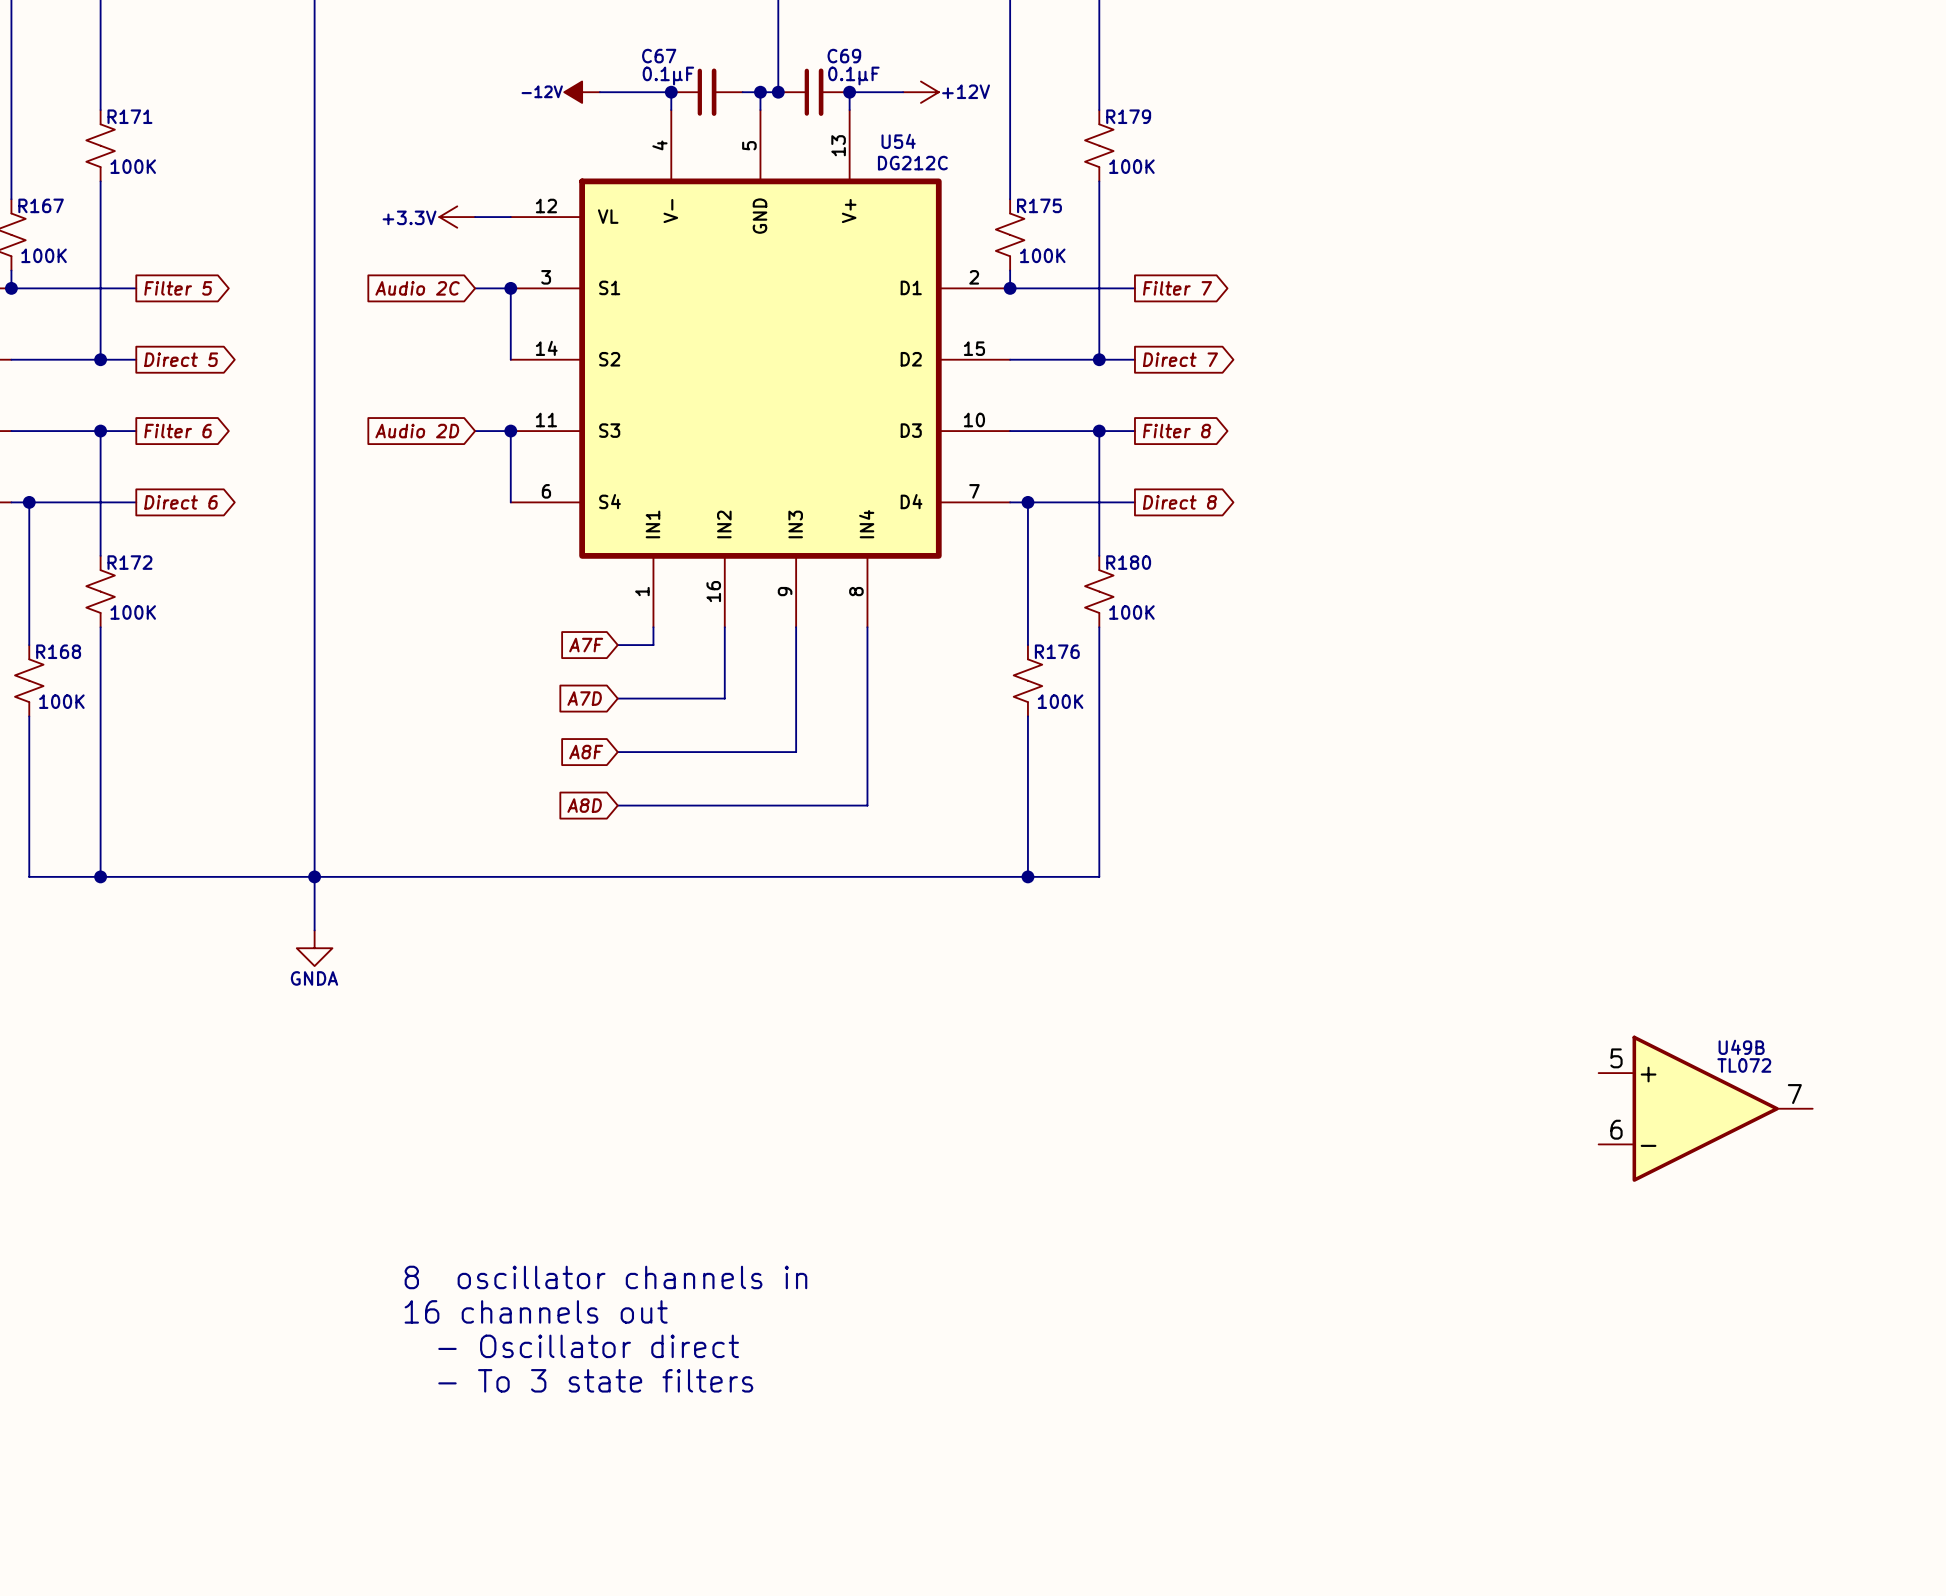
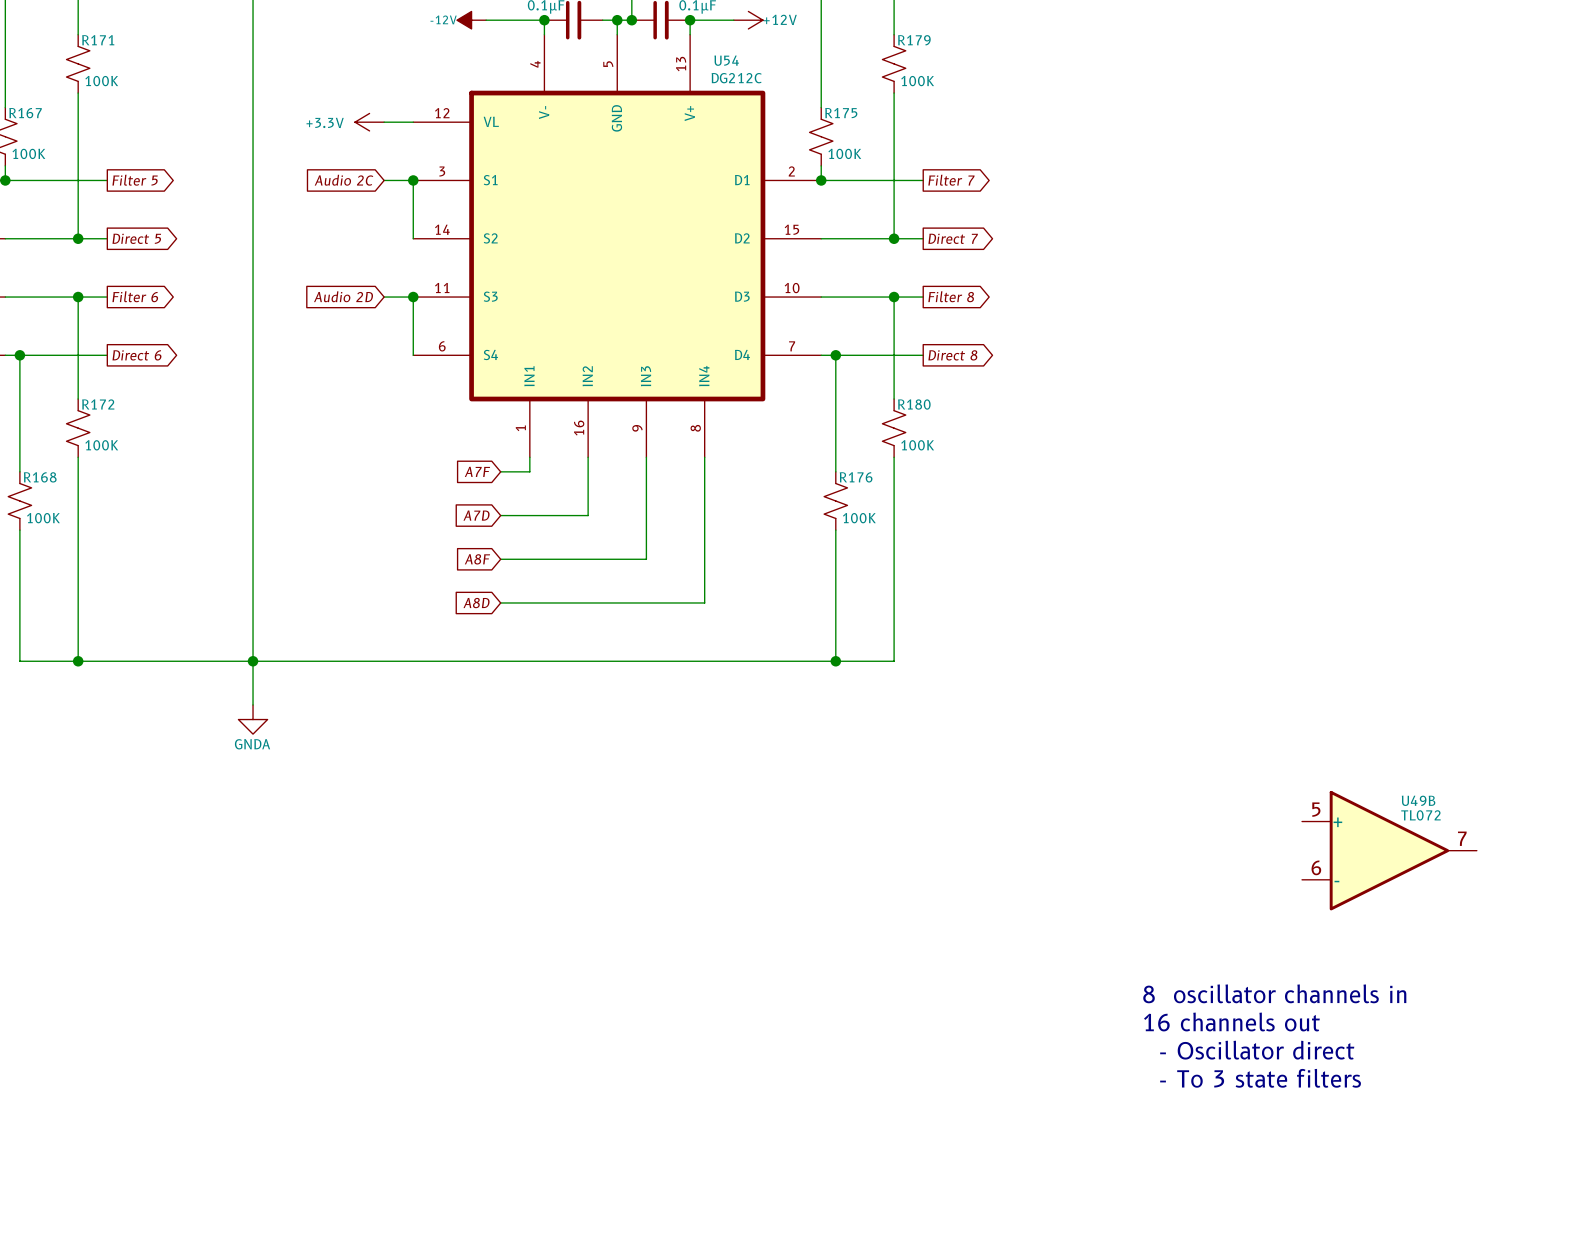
text: 8 oscillator channels in (605, 1277) -> none
text: none -> 8 oscillator channels in (1274, 993)
text: 16 channels out (536, 1311) -> none
text: none -> 16 channels out (1231, 1022)
text: - Oscillator direct (588, 1346) -> none
text: none -> - Oscillator direct (1257, 1050)
text: - To 3 state filters (595, 1380) -> none
text: none -> - To 3 state filters (1260, 1078)

